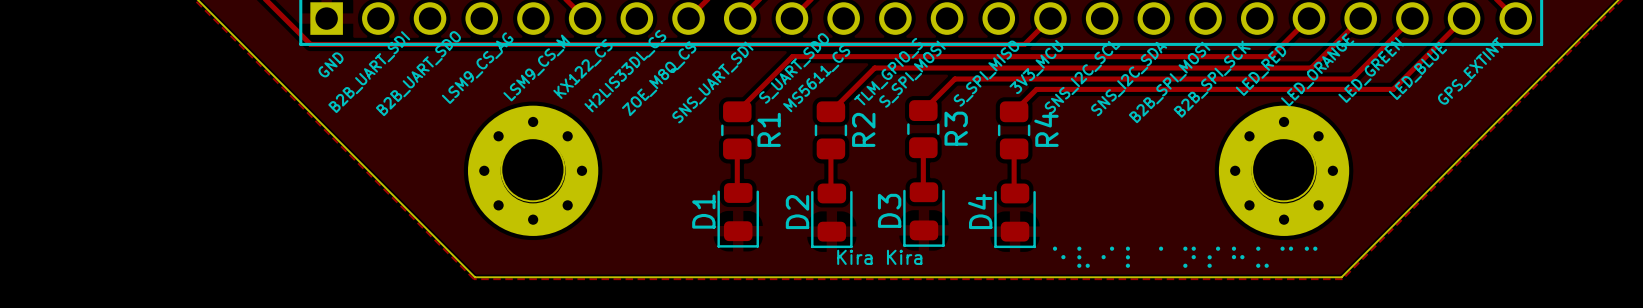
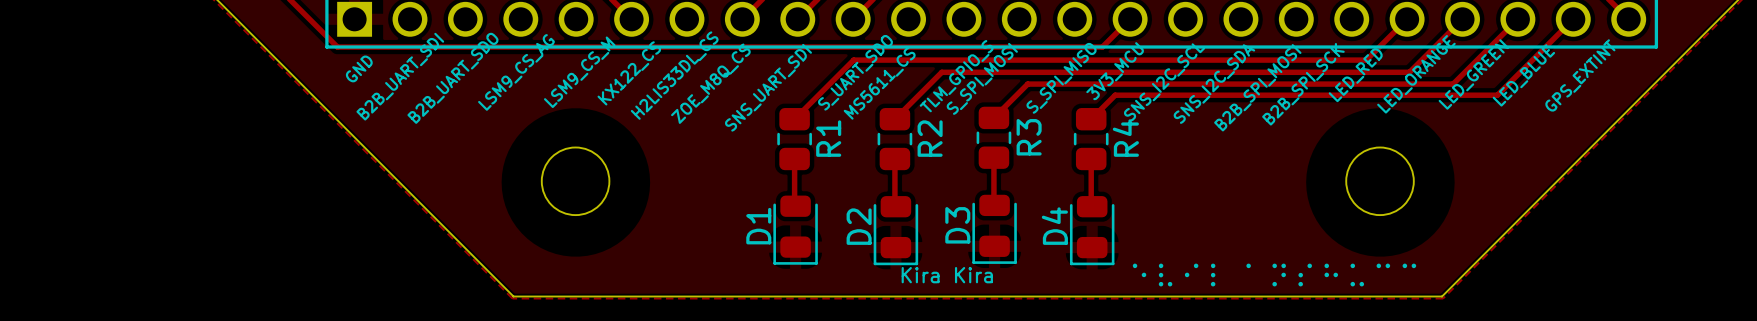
part: (533, 170) -> none
part: (1284, 170) -> none

